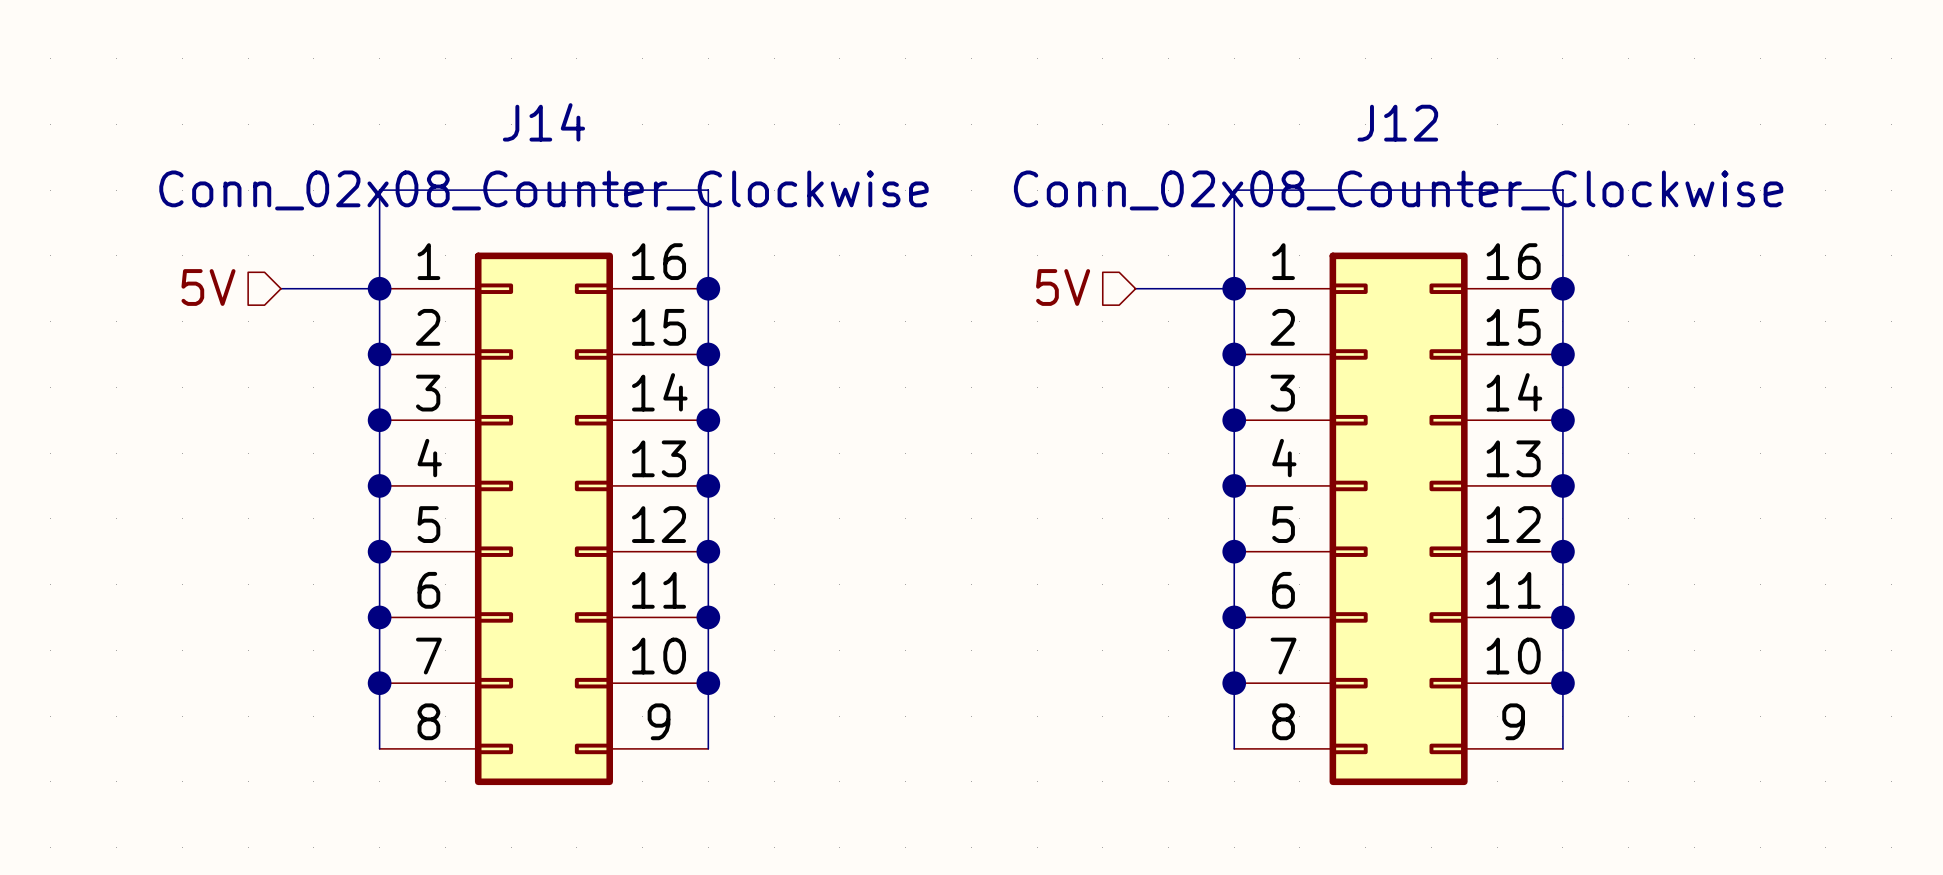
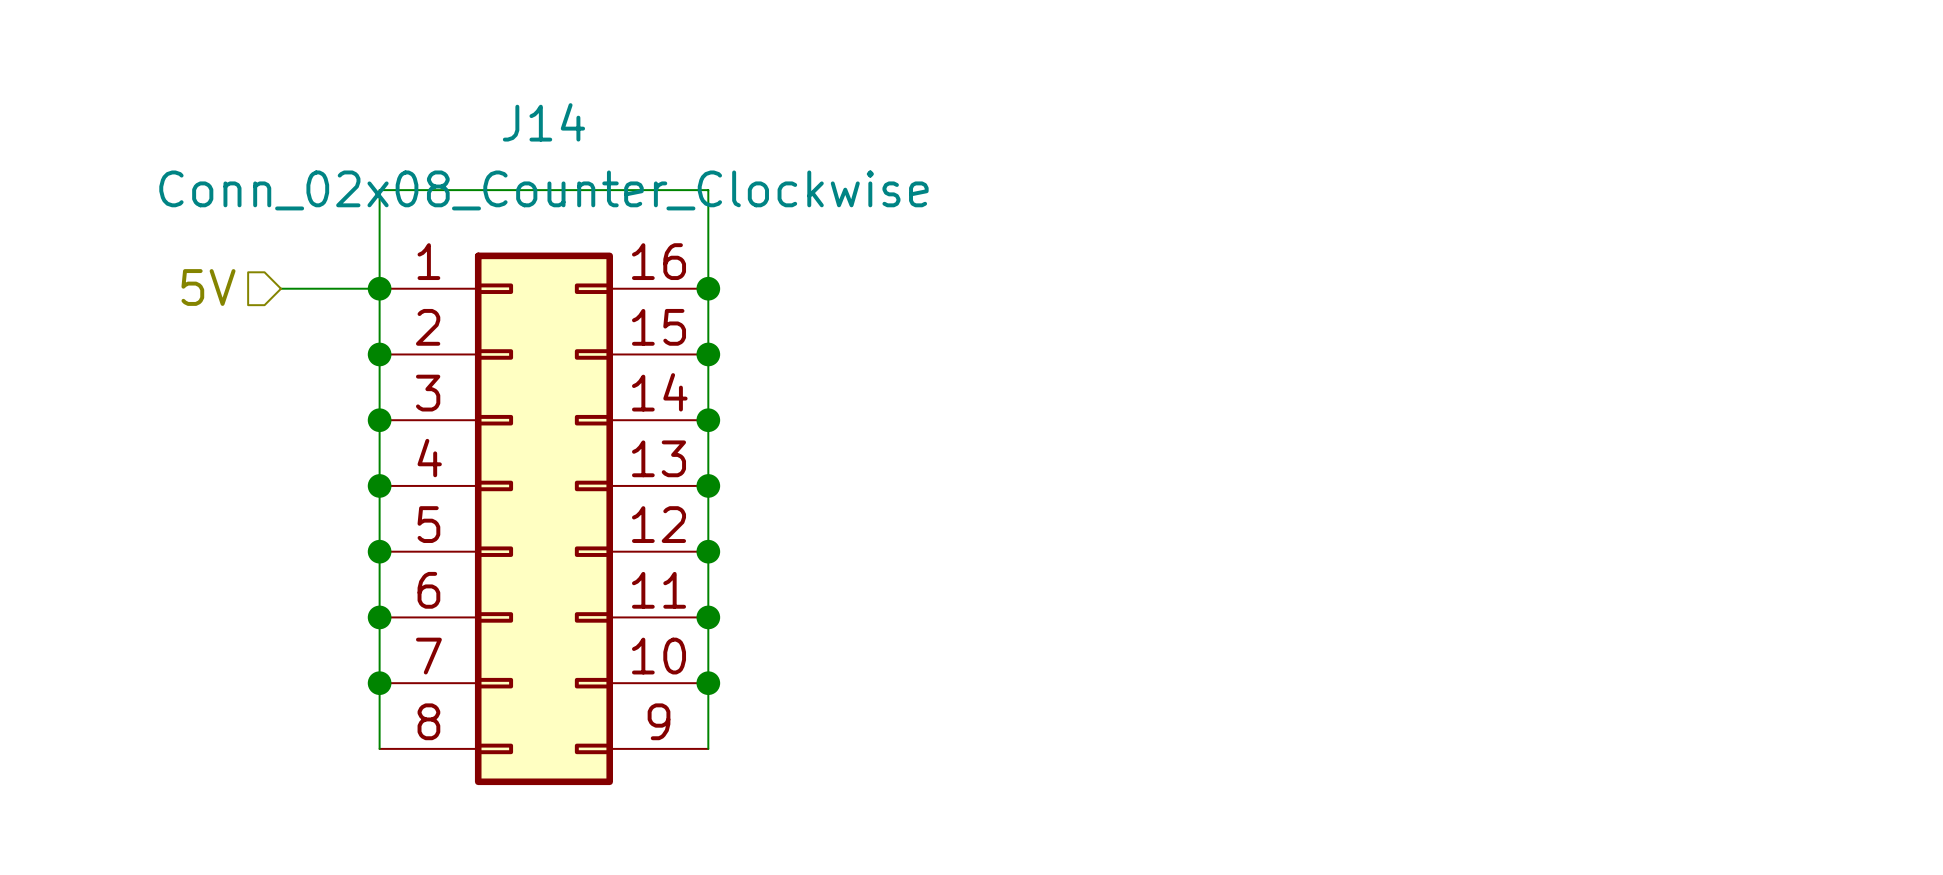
hierarchical label: 5V (1063, 287) -> none
wire: (1135, 288) (1234, 288) -> none
junction: (1234, 288) -> none
junction: (1562, 288) -> none
junction: (1234, 354) -> none
junction: (1562, 354) -> none
junction: (1234, 420) -> none
junction: (1562, 420) -> none
junction: (1234, 485) -> none
junction: (1562, 485) -> none
J12: Conn_02x08_Counter_Clockwise (1398, 518) -> none
junction: (1234, 551) -> none
junction: (1562, 551) -> none
junction: (1234, 617) -> none
junction: (1562, 617) -> none
junction: (1234, 683) -> none
junction: (1562, 683) -> none
wire: (1234, 748) (1234, 190) (1562, 190) (1562, 748) -> none

